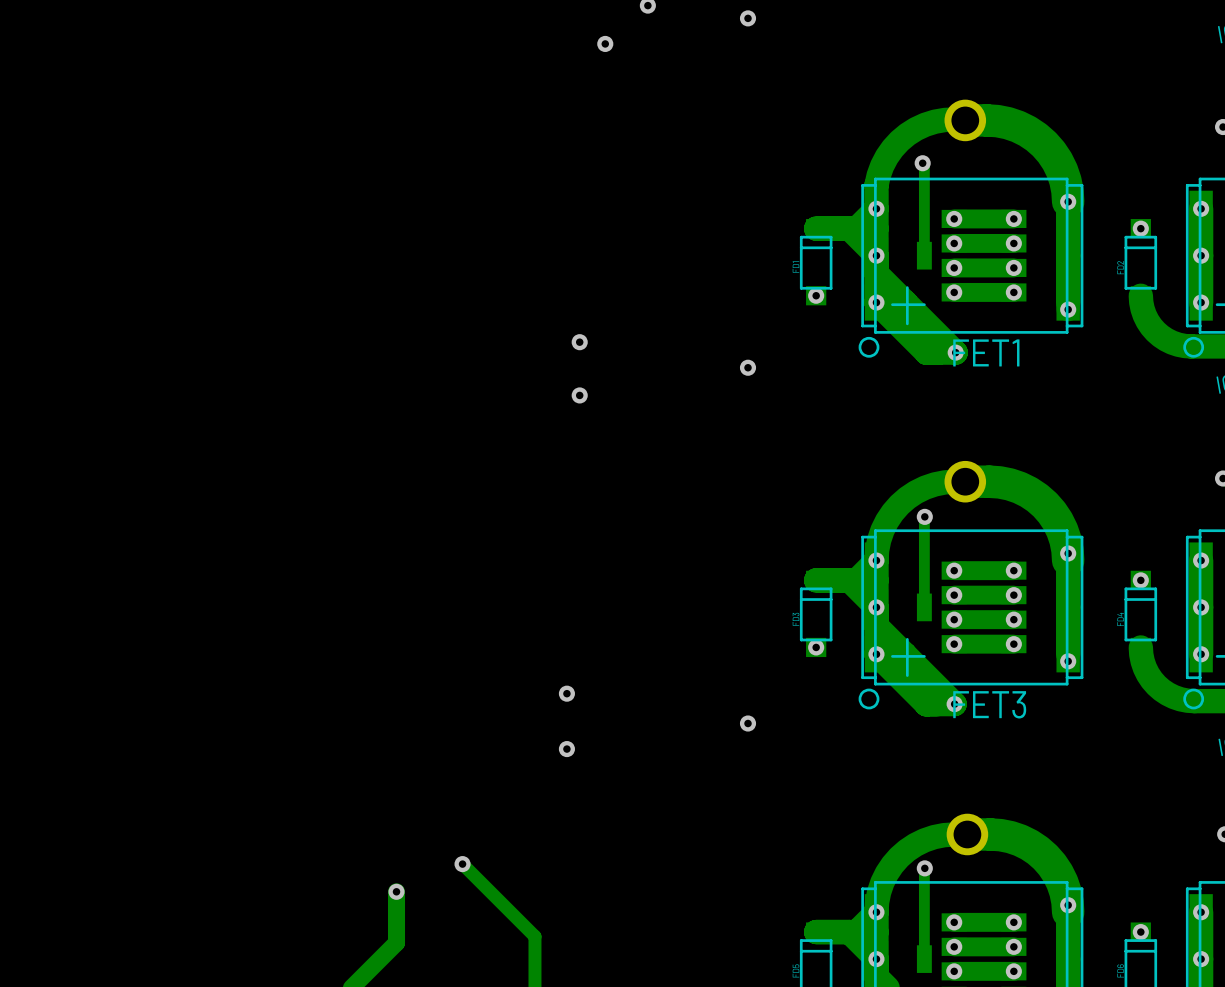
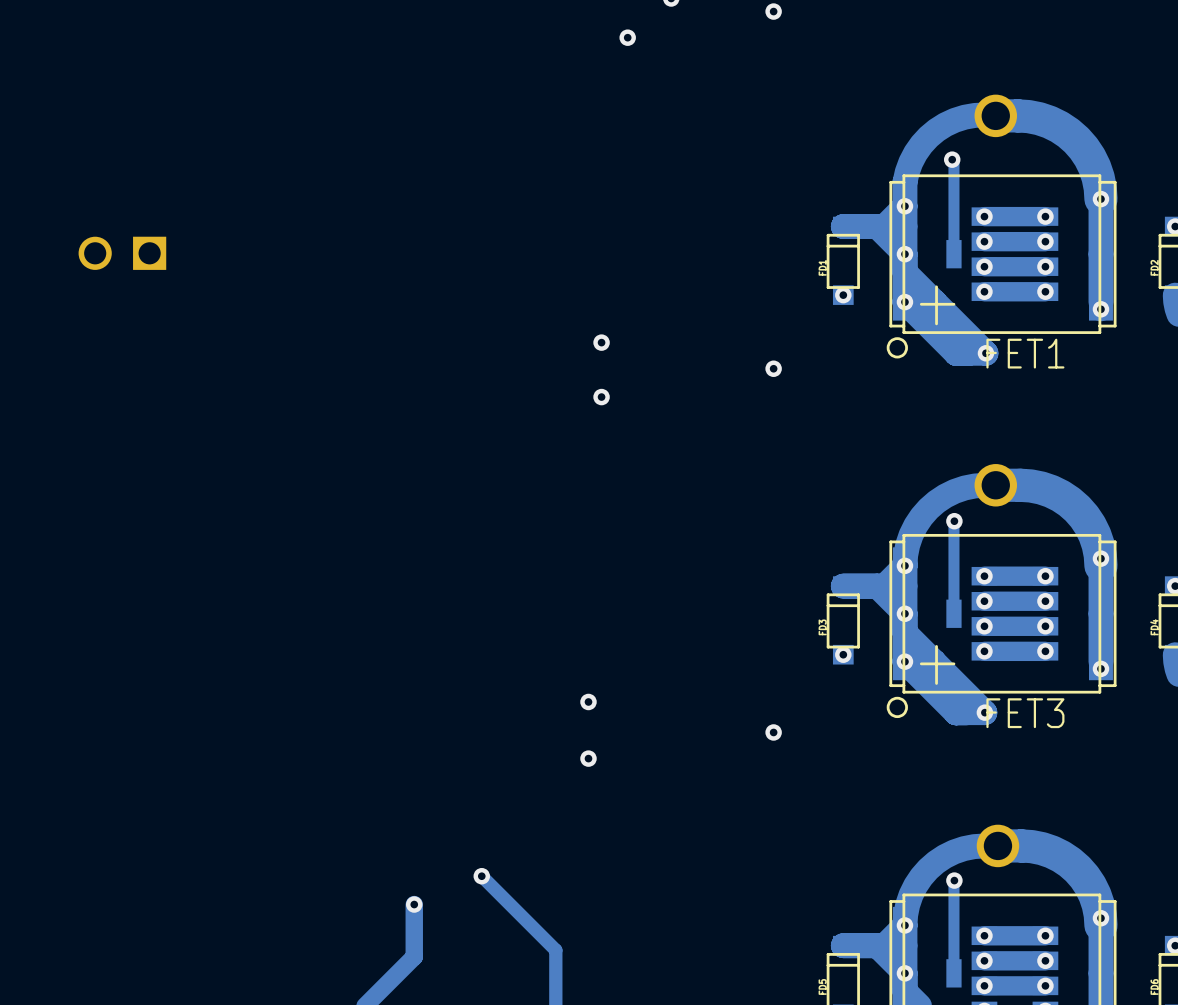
part: none -> (122, 253)

